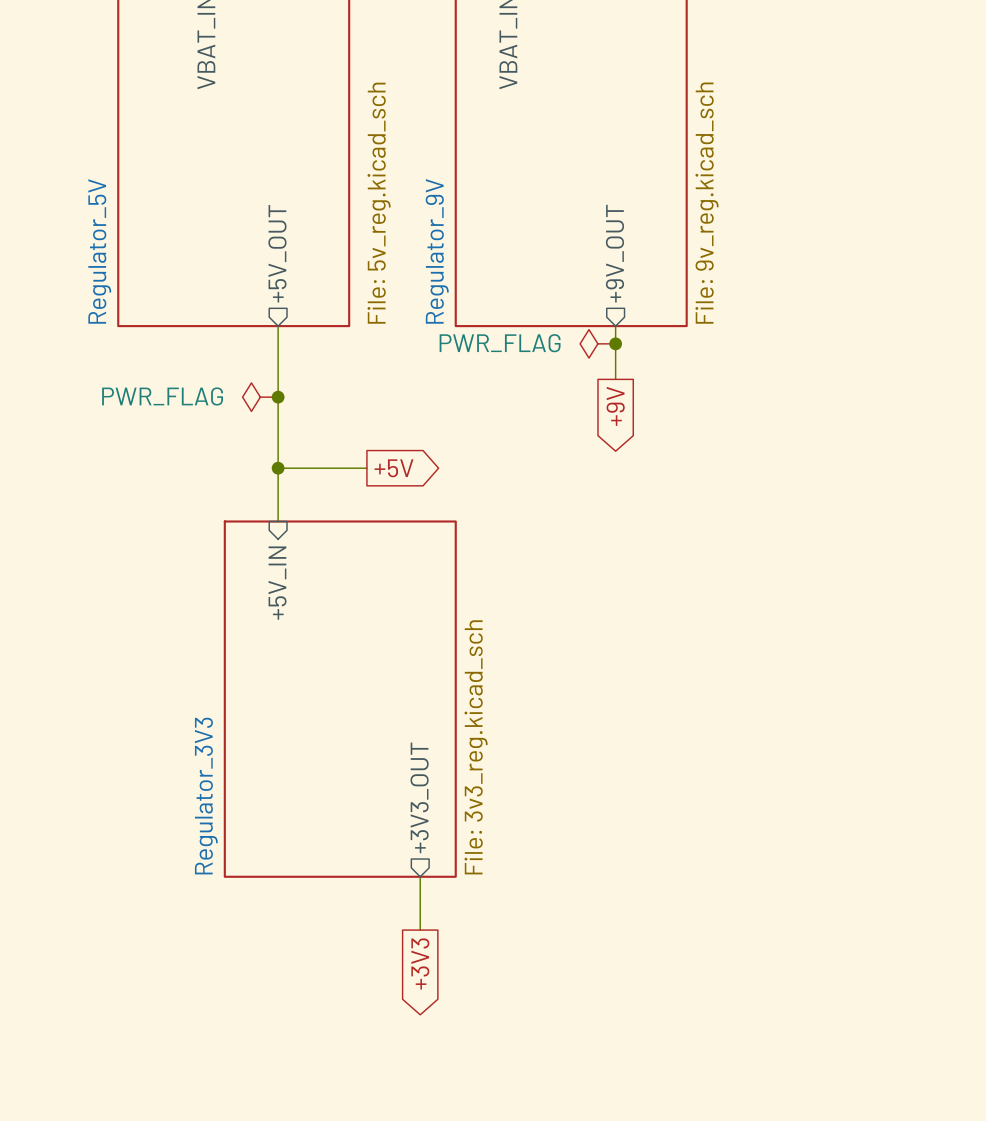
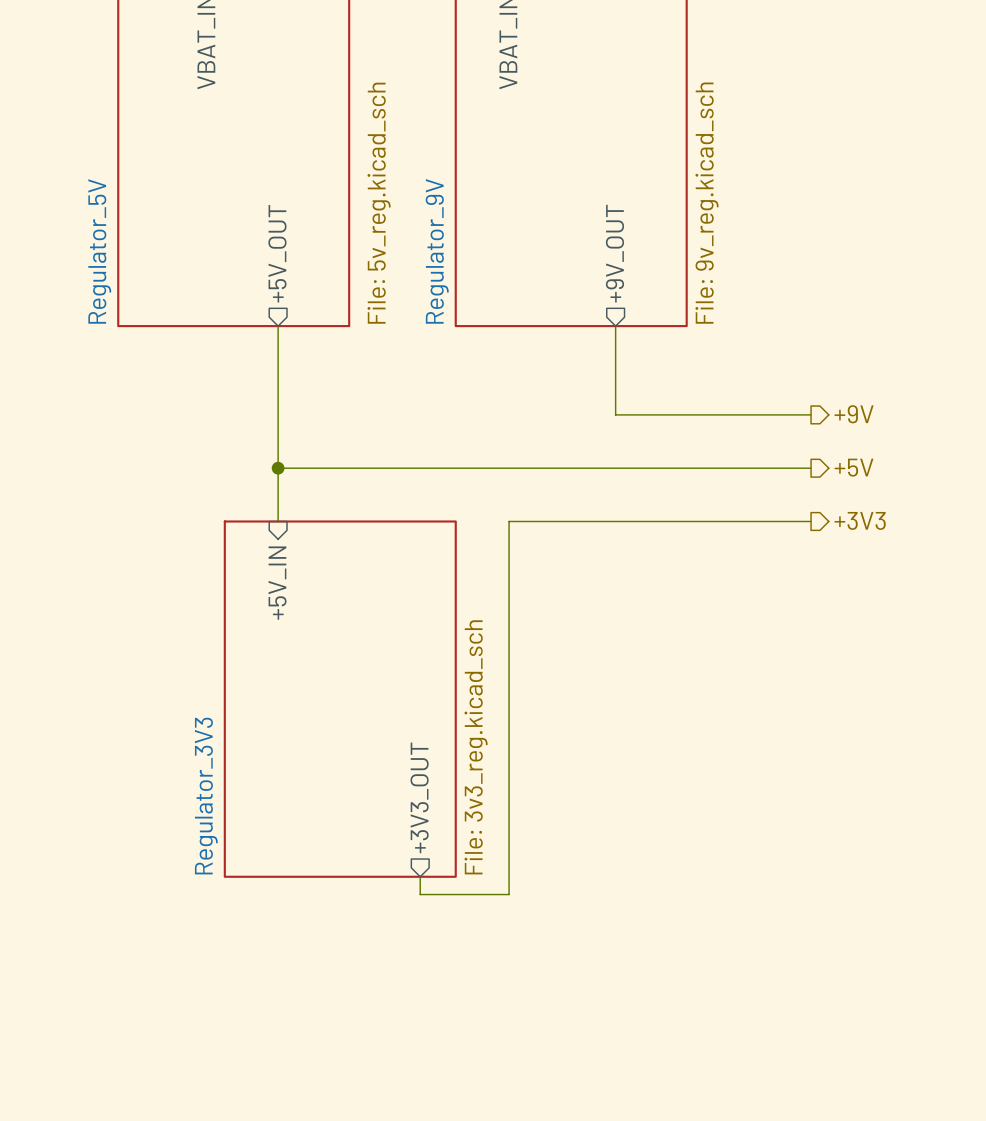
power symbol: PWR_FLAG (597, 343) -> none
junction: (615, 343) -> none
wire: none -> (615, 379) (615, 414) (811, 414)
power symbol: PWR_FLAG (260, 397) -> none
junction: (278, 397) -> none
global label: +9V (615, 406) -> none
hierarchical label: none -> +9V (854, 414)
hierarchical label: none -> +5V (854, 467)
wire: none -> (366, 468) (811, 468)
global label: +5V (394, 468) -> none
hierarchical label: none -> +3V3 (860, 520)
wire: (420, 894) (420, 930) -> (420, 894) (509, 894) (509, 521) (811, 521)
global label: +3V3 (420, 963) -> none

